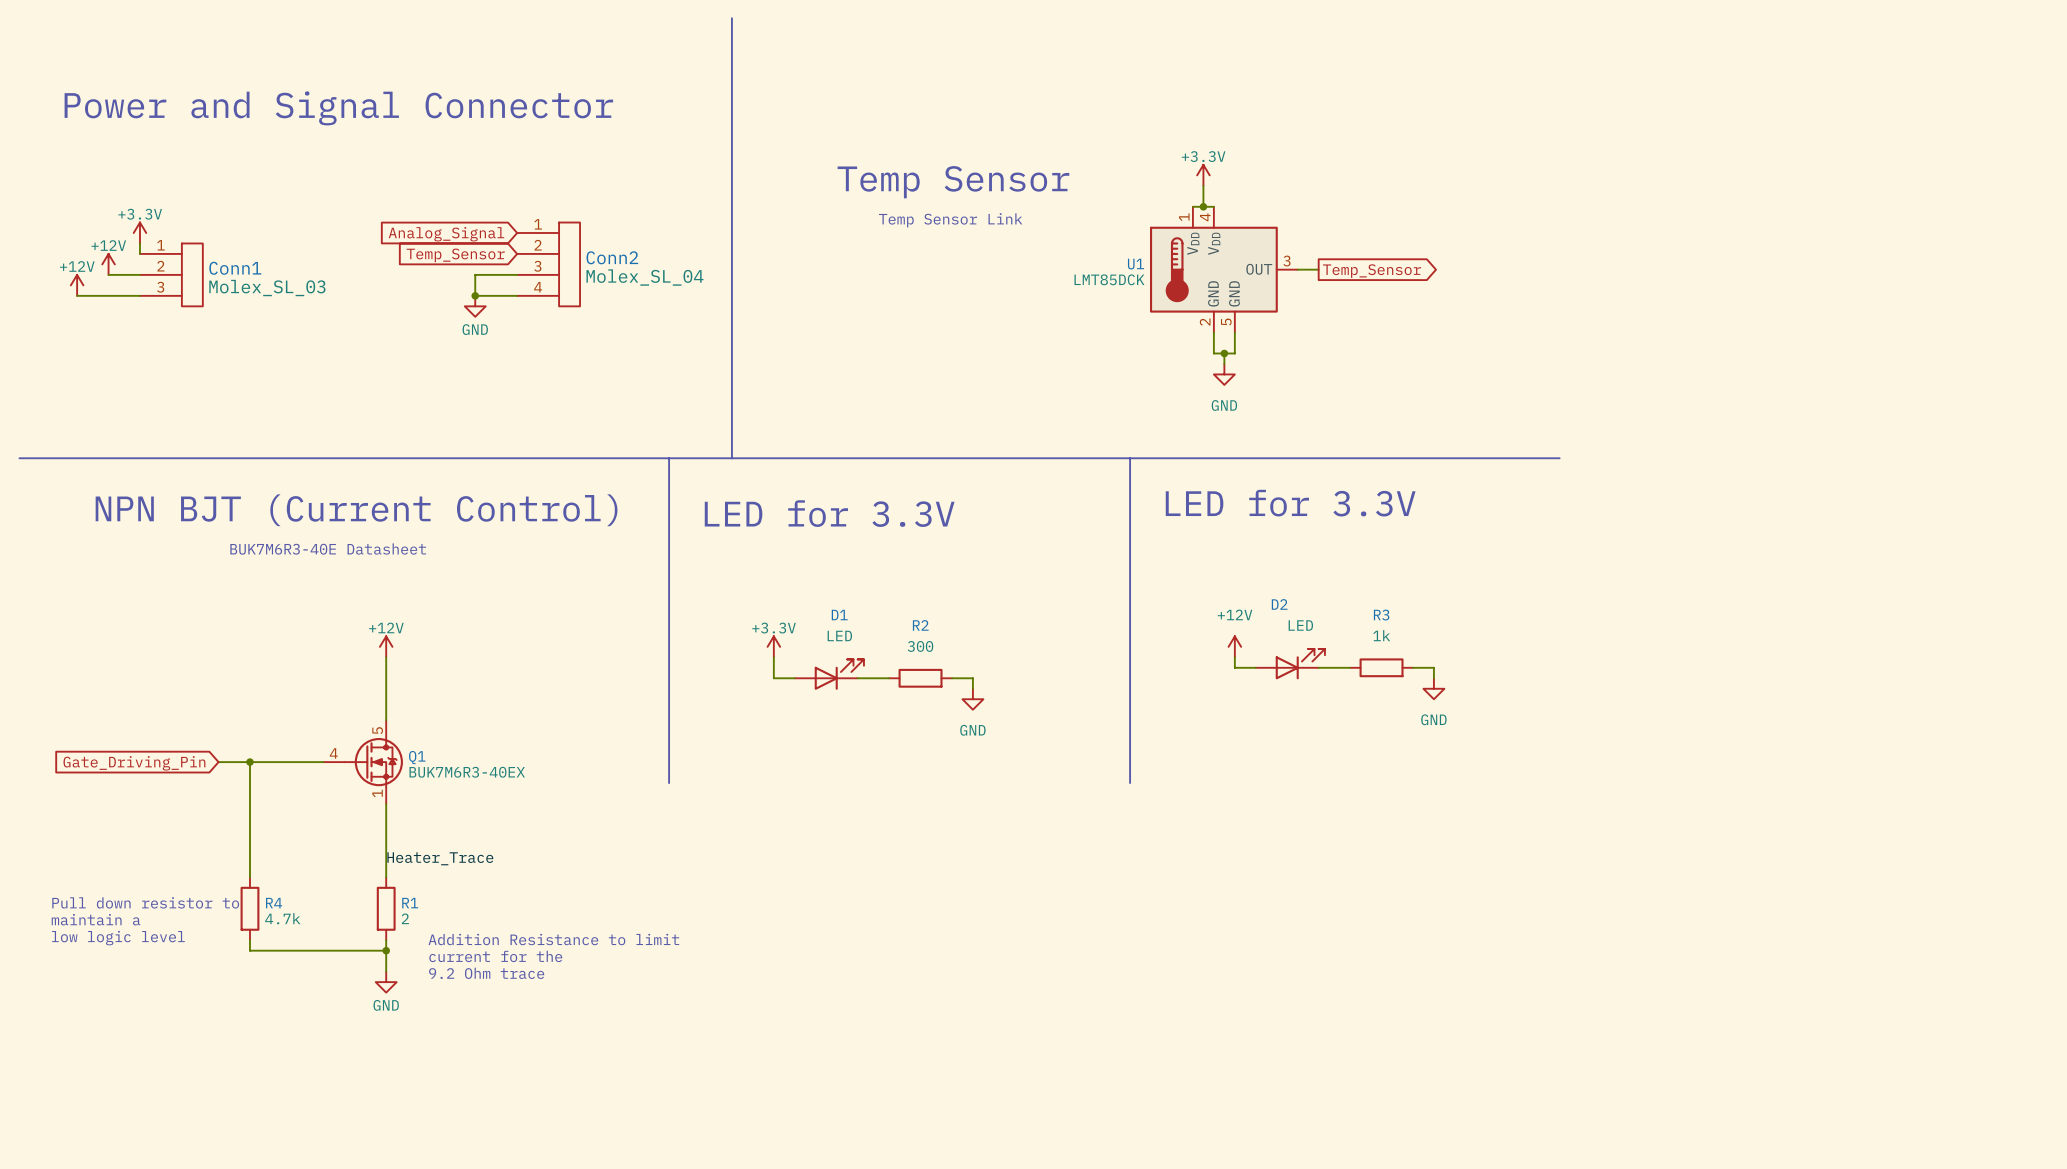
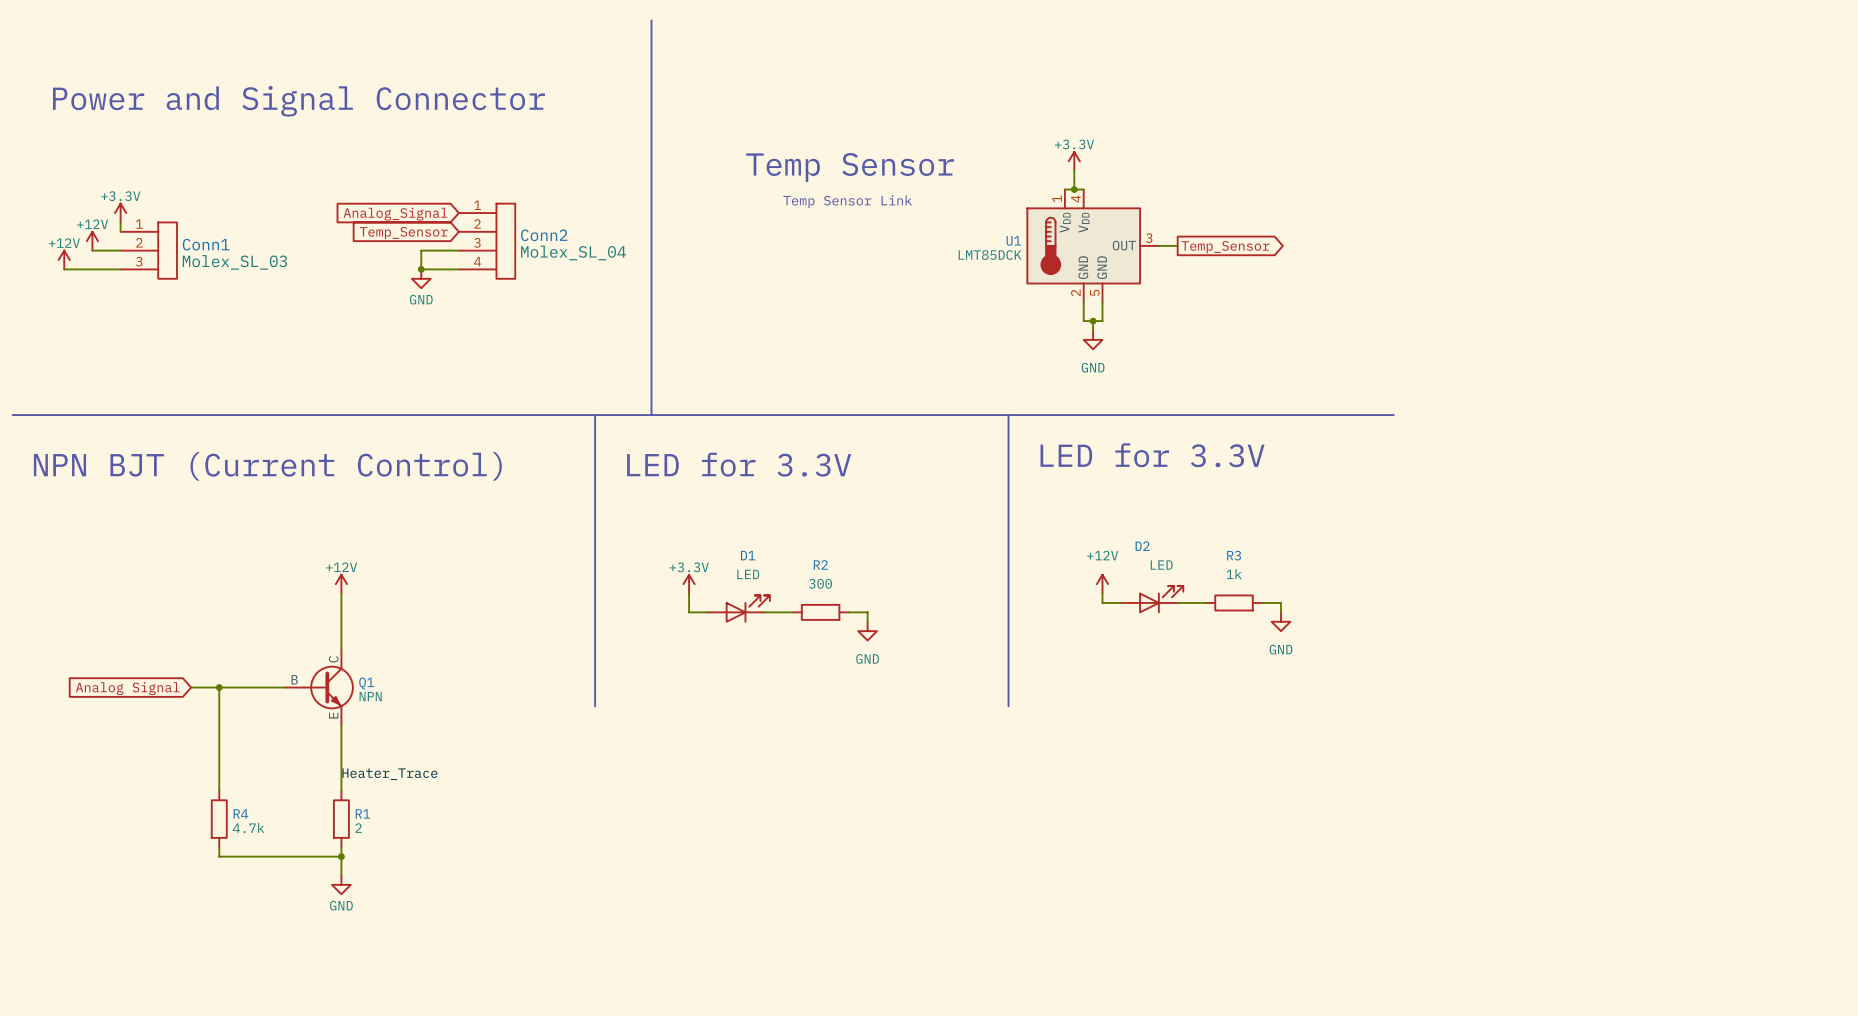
text position: NPN BJT (Current Control) (356, 510) -> NPN BJT (Current Control) (267, 466)
text: BUK7M6R3-40E Datasheet (328, 548) -> none
Q1 symbol: [323, 720, 403, 805] -> [285, 649, 354, 726]
global label: Gate_Driving_Pin (134, 763) -> Analog Signal (127, 688)
Q1 value: BUK7M6R3-40EX (467, 772) -> NPN (370, 696)
text: Pull down resistor to (145, 902) -> none
text: maintain a (95, 919) -> none
text: low logic level (118, 938) -> none
text: Addition Resistance to limit (553, 939) -> none
text: current for the (495, 956) -> none
text: 9.2 Ohm trace (486, 973) -> none

